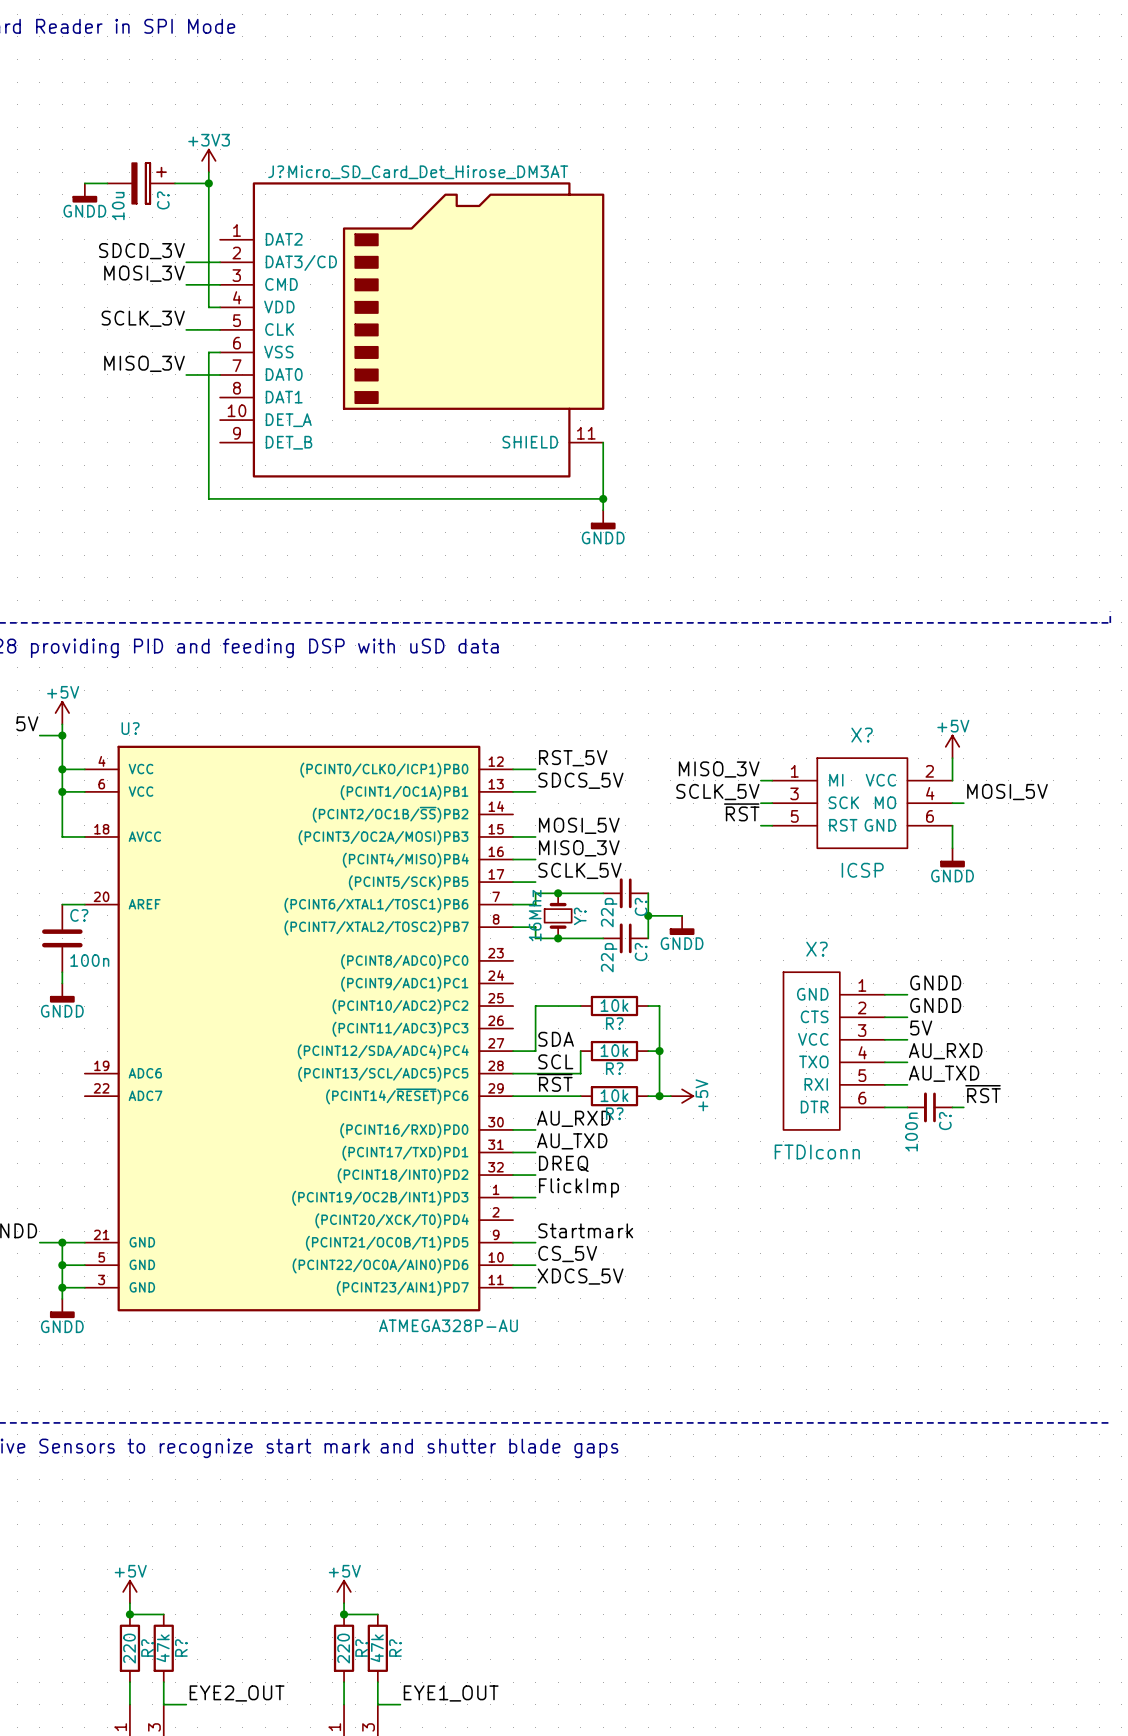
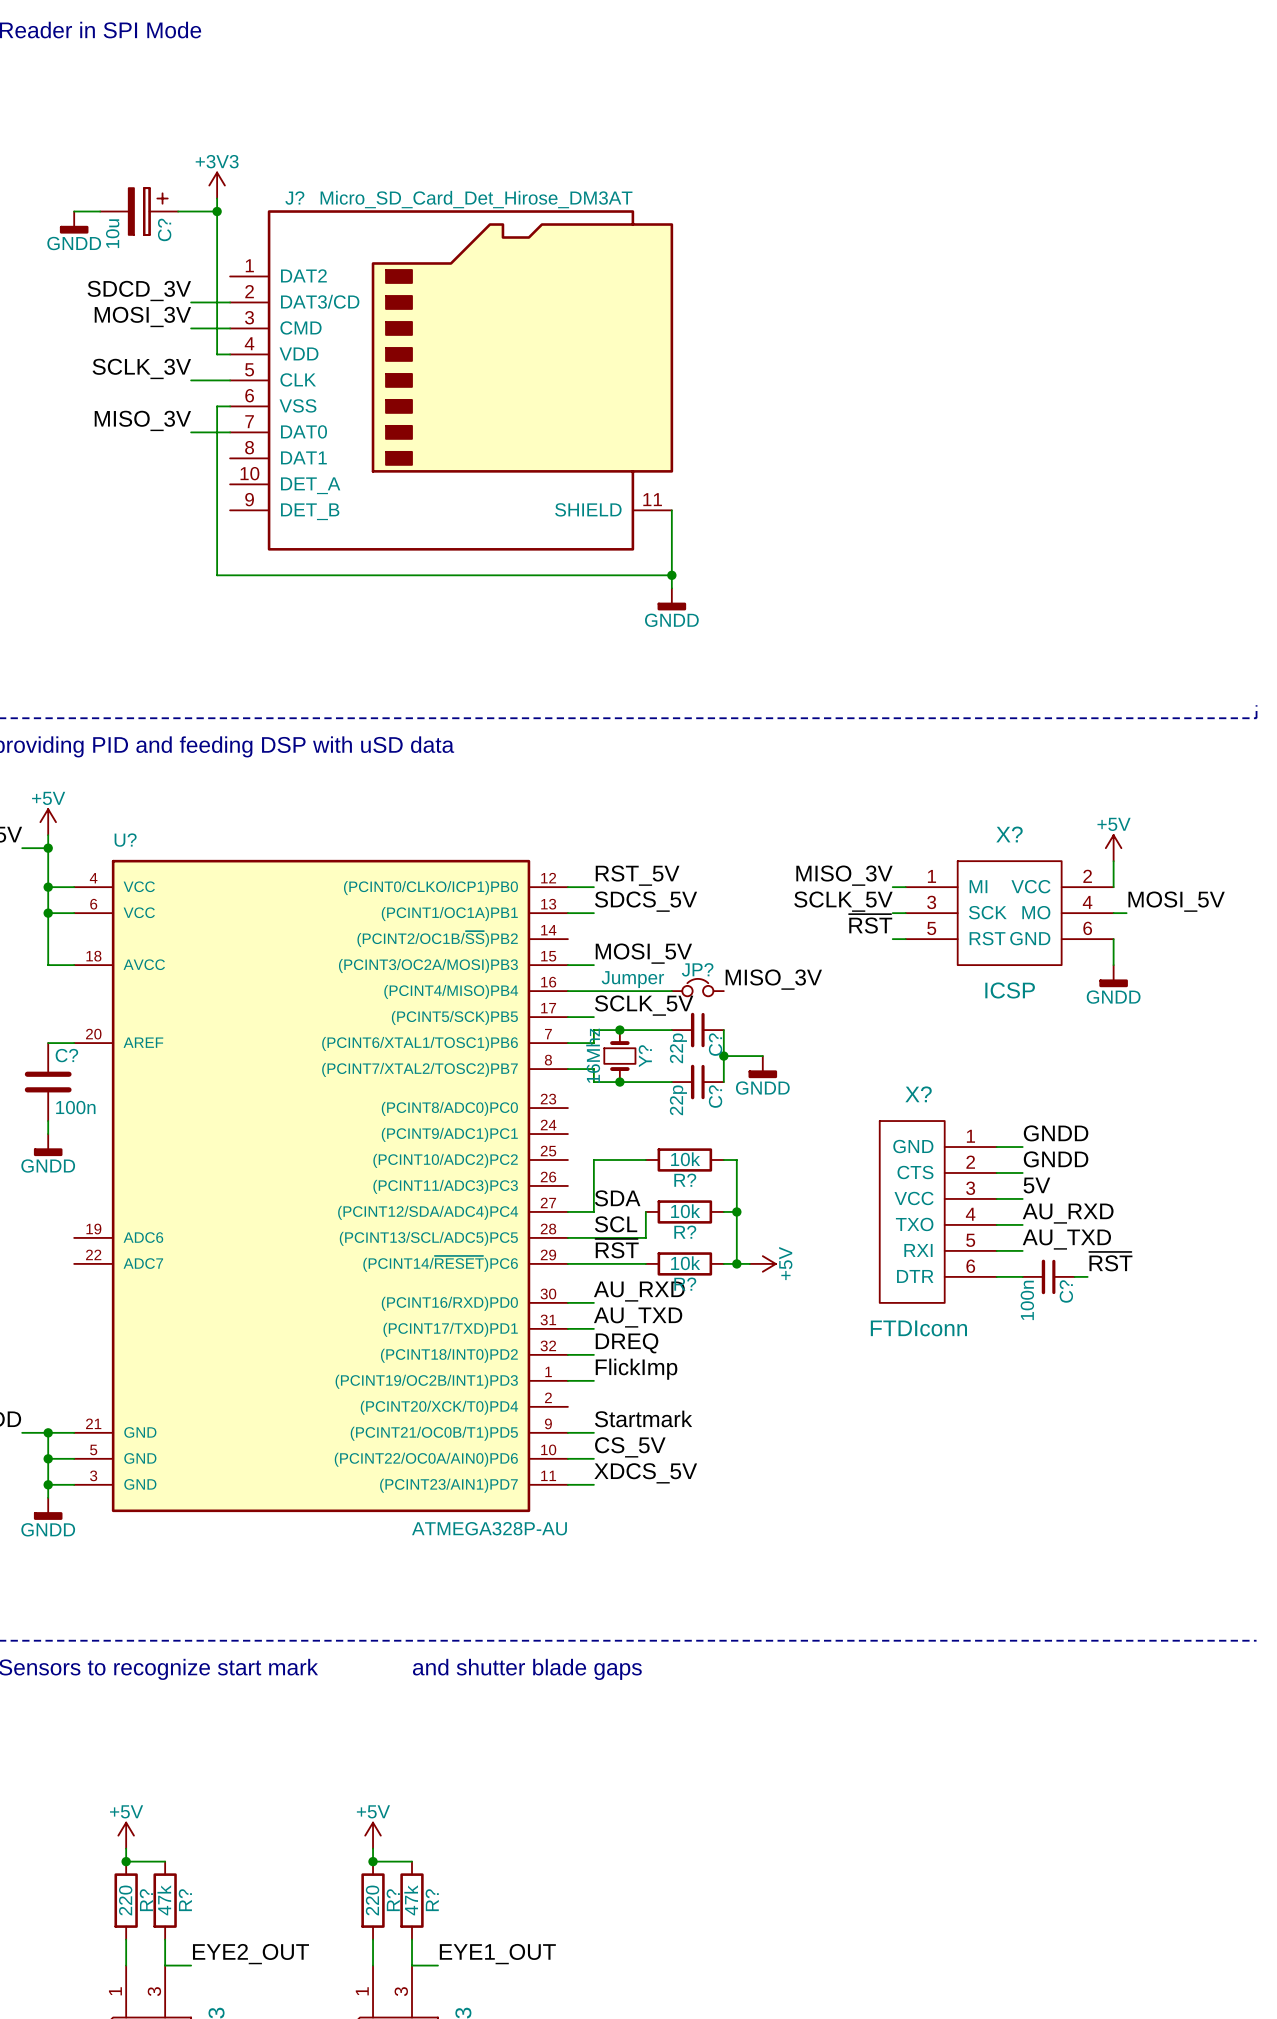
power symbol position: +5V (952, 746) -> +5V (1113, 848)
wire: (952, 758) (952, 780) -> (1113, 861) (1113, 887)
label position: MISO_3V (719, 769) -> MISO_3V (844, 875)
wire: (760, 780) (772, 780) -> (892, 887) (905, 887)
label position: SCLK_5V (717, 792) -> SCLK_5V (843, 901)
label position: MOSI_5V (1007, 792) -> MOSI_5V (1176, 901)
wire: (760, 803) (772, 803) -> (892, 913) (905, 913)
X? position: (862, 803) -> (1009, 913)
wire: (952, 803) (963, 803) -> (1113, 913) (1126, 913)
label position: ~{RST} (741, 812) -> ~{RST} (870, 923)
wire: (760, 825) (772, 825) -> (892, 939) (905, 939)
wire: (952, 825) (952, 848) -> (1113, 939) (1113, 965)
label: MISO_3V (579, 848) -> none
label: none -> MISO_3V (773, 979)
JP?: none -> Jumper (697, 987)
power symbol position: GNDD (952, 857) -> GNDD (1113, 976)
wire: none -> (593, 991) (671, 991)

